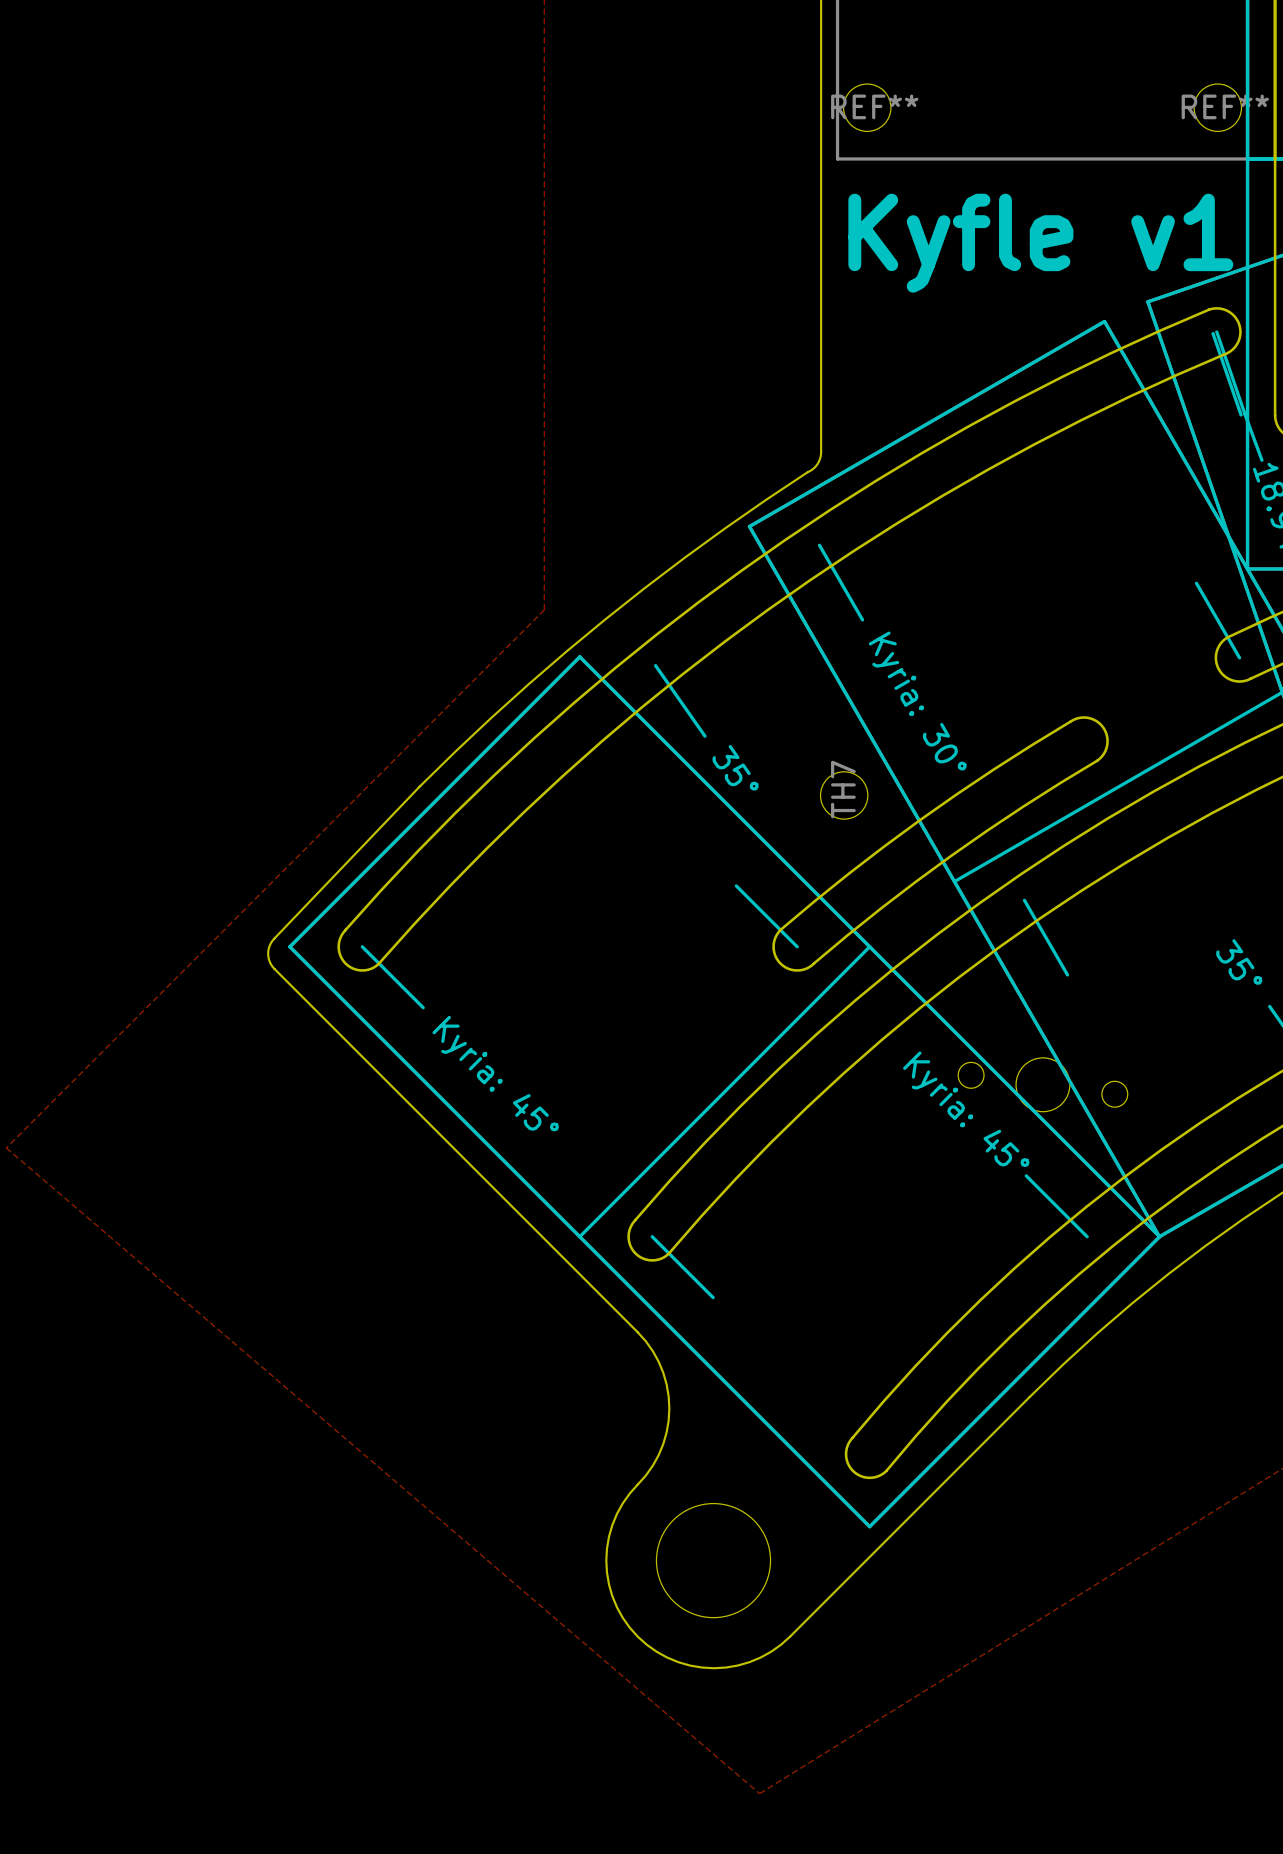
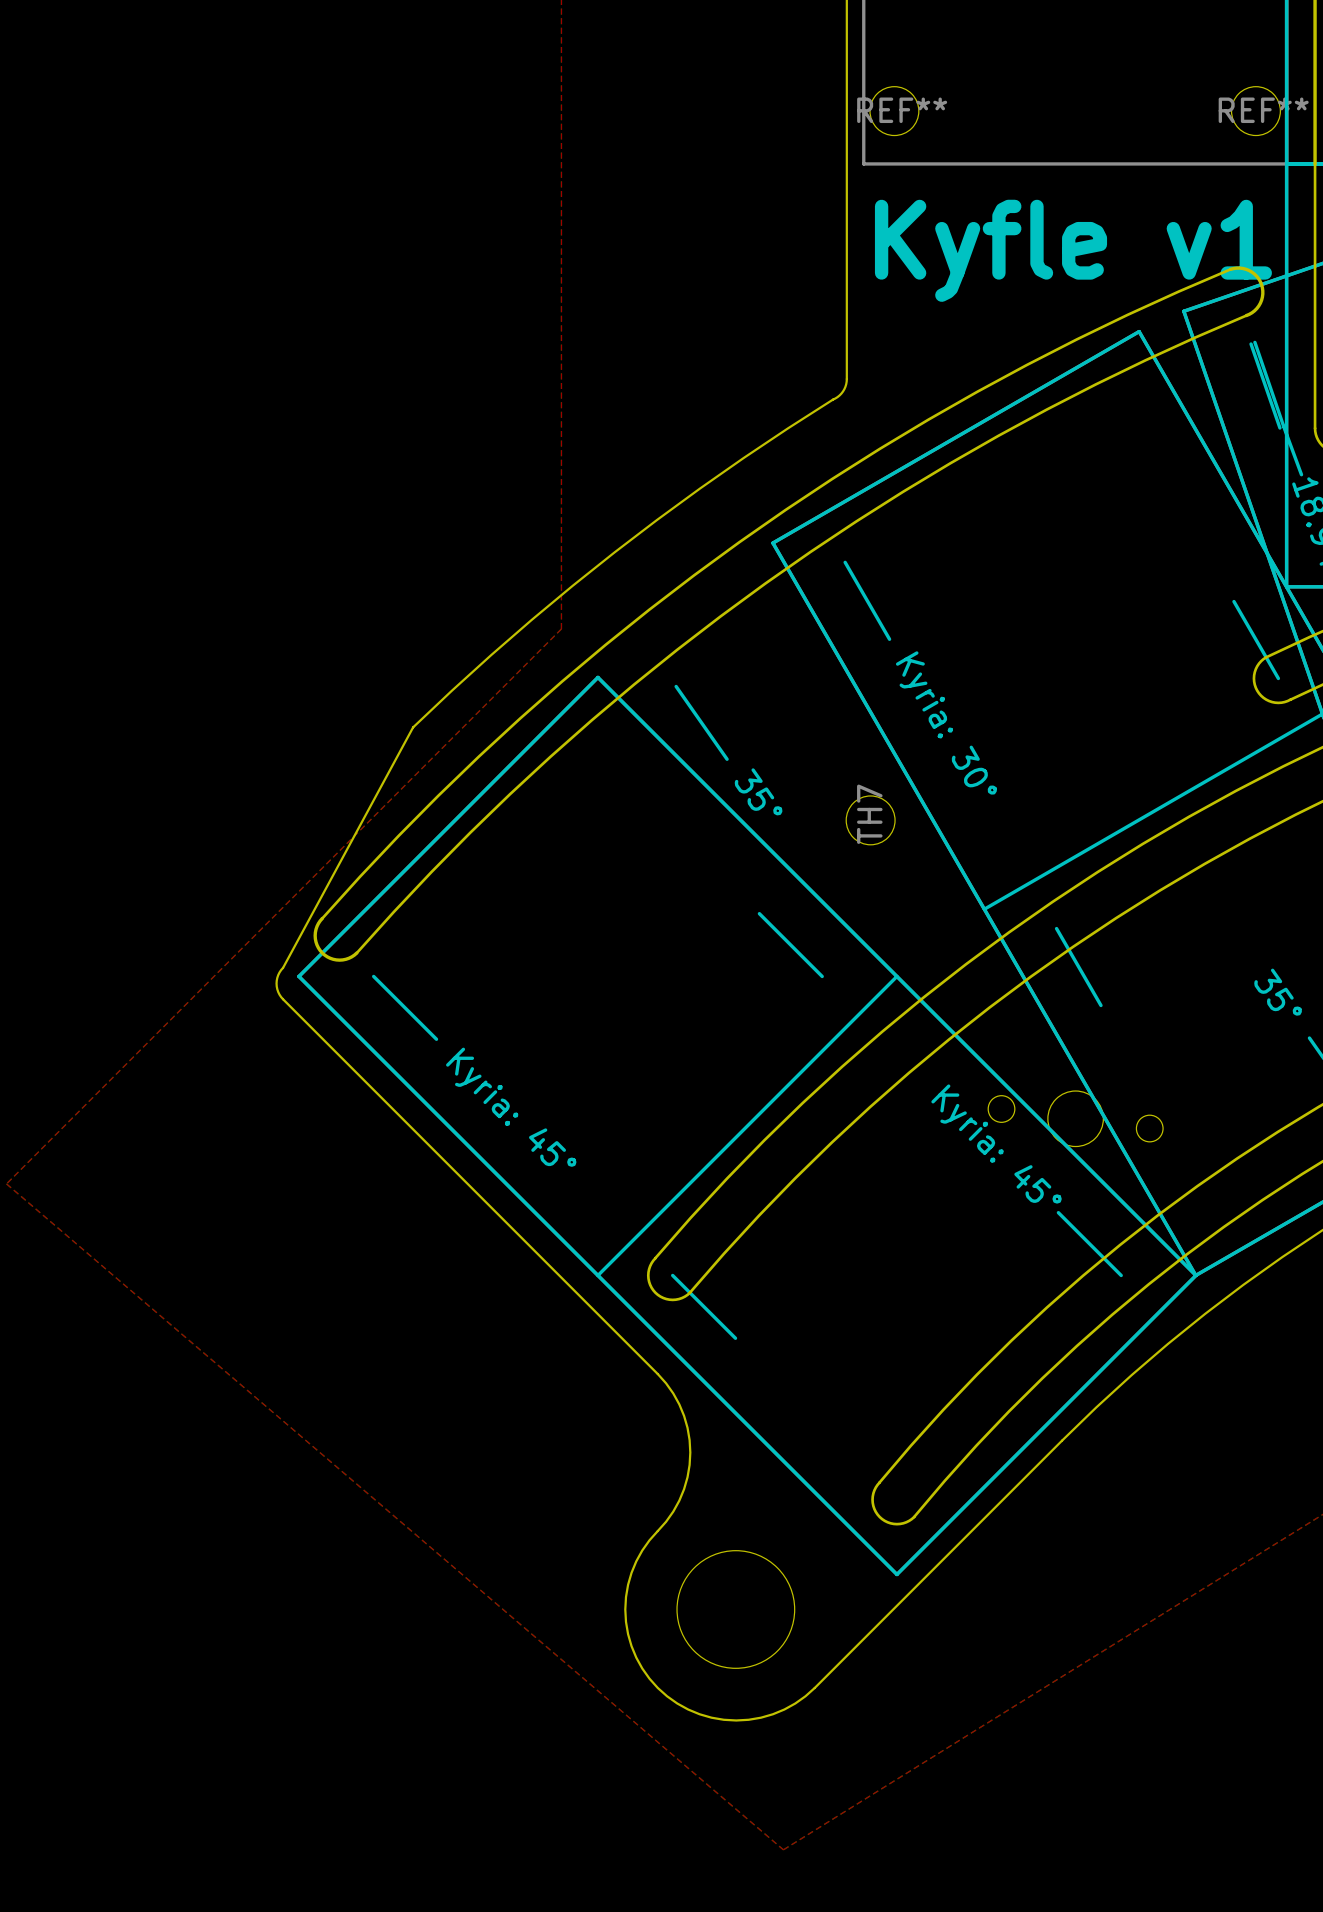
board edge: (821, 367) (821, 452) (815, 466) (684, 557) (605, 619) (529, 683) (419, 786) (274, 938) -> (846, 379) (844, 389) (837, 397) (699, 488) (572, 585) (491, 654) (413, 727) (283, 967)
board edge: (780, 930) (849, 873) (920, 819) (1032, 744) (1078, 718) (1091, 718) (1101, 725) (1106, 733) (1107, 742) (1105, 751) (1099, 758) (1023, 806) (951, 855) (881, 908) (813, 963) -> none
board edge: (780, 930) (775, 937) (773, 946) (775, 955) (780, 963) (788, 968) (797, 970) (806, 968) (813, 963) -> none
board edge: (379, 963) (486, 848) (562, 776) (642, 707) (724, 641) (853, 551) (988, 469) (1081, 420) (1230, 351) (1236, 345) (1240, 336) (1240, 327) (1236, 318) (1224, 309) (1209, 309) (1111, 353) (1015, 401) (921, 453) (830, 509) (698, 602) (614, 668) (533, 738) (455, 812) (345, 930) (340, 937) (338, 946) (340, 955) (345, 963) (353, 968) (362, 970) (371, 968) (379, 963) -> (1230, 269) (1076, 339) (928, 419) (785, 509) (694, 575) (562, 681) (438, 795) (320, 920) (315, 935) (320, 950) (327, 956) (336, 959) (345, 959) (354, 955) (470, 832) (591, 720) (677, 649) (810, 551) (903, 491) (1046, 409) (1145, 360) (1252, 312) (1261, 300) (1262, 290) (1260, 281) (1249, 270) (1239, 268) (1230, 269)

